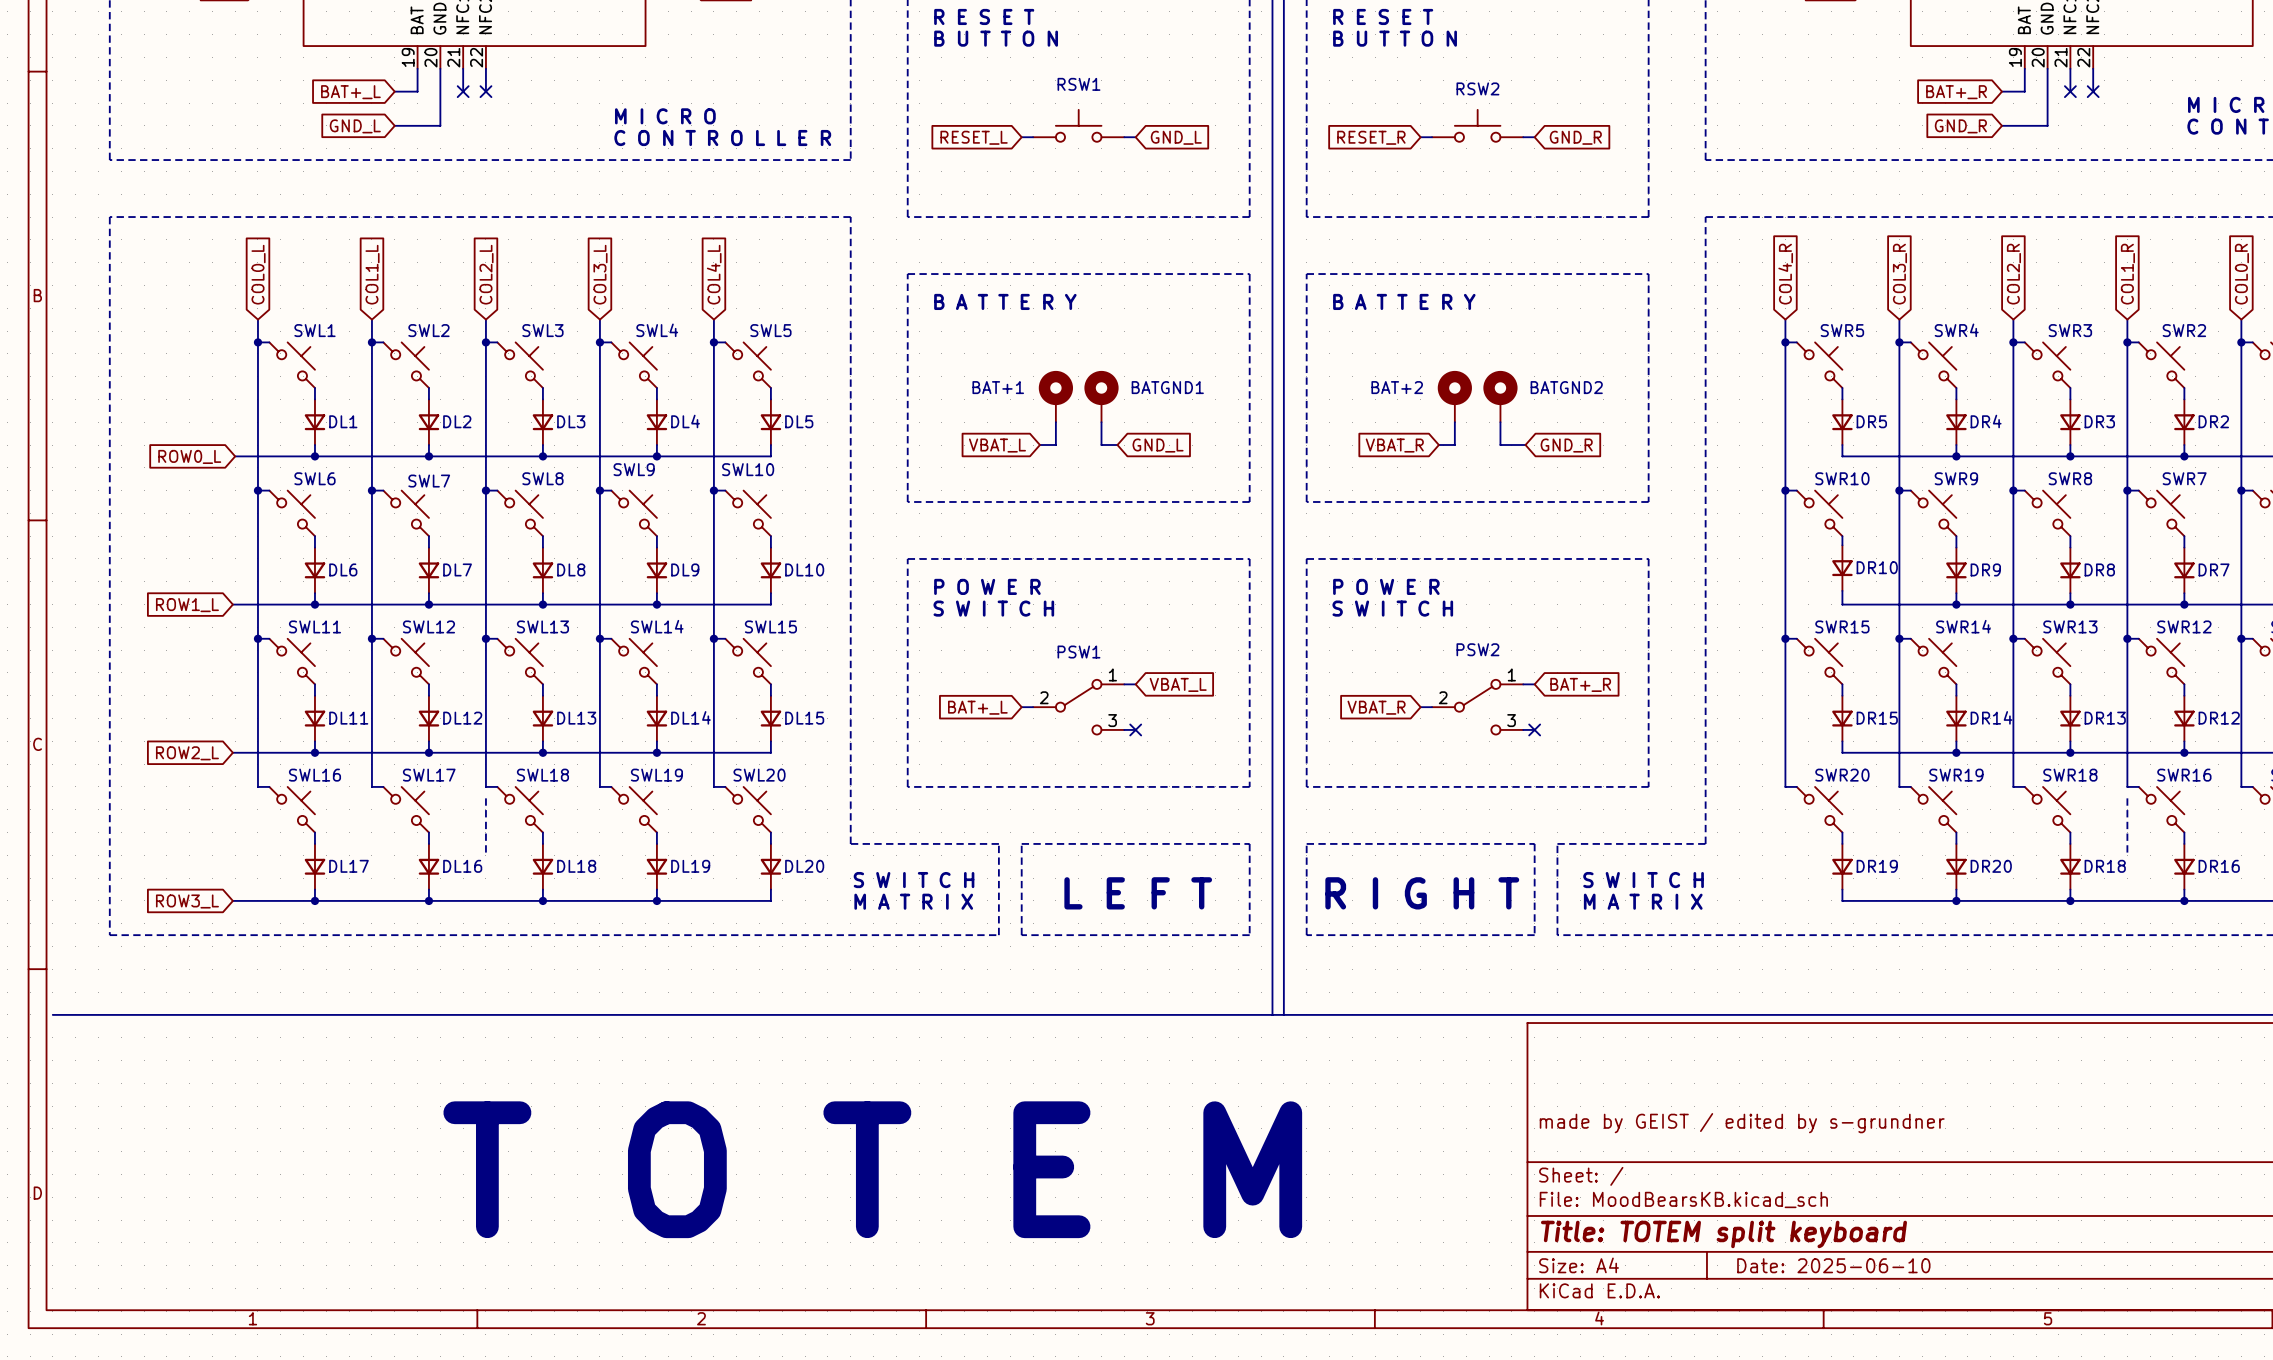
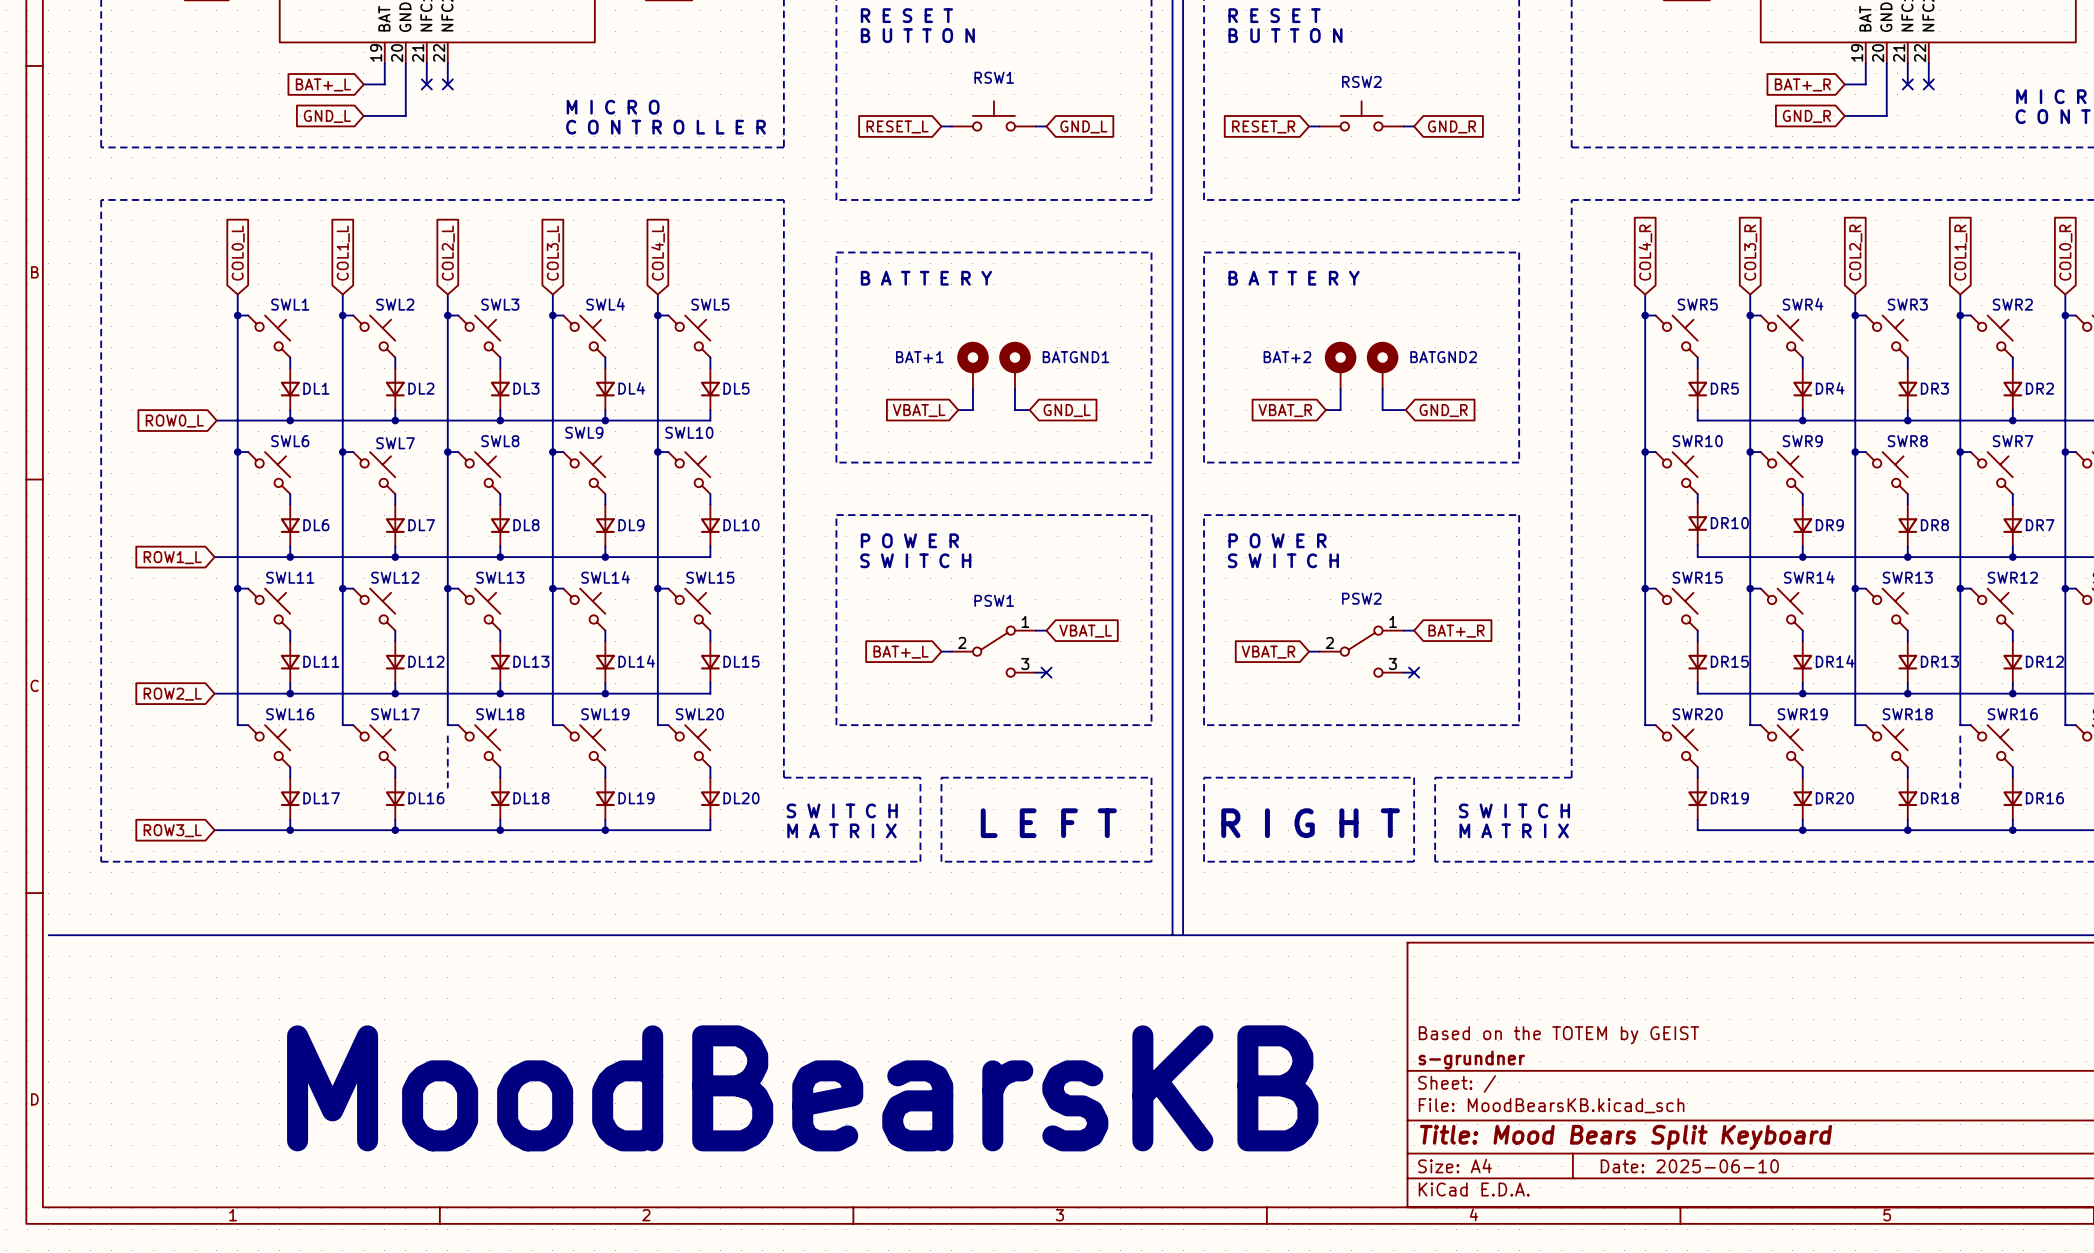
title block: made by GEIST / edited by s-grundner (1742, 1123) -> Based on the TOTEM by GEIST (1558, 1035)
title block: none -> s-grundner (1471, 1060)
text: T O T E M (872, 1169) -> none
text: none -> MoodBearsKB (802, 1088)
title block: Title: TOTEM split keyboard (1723, 1234) -> Title: Mood Bears Split Keyboard (1625, 1137)

